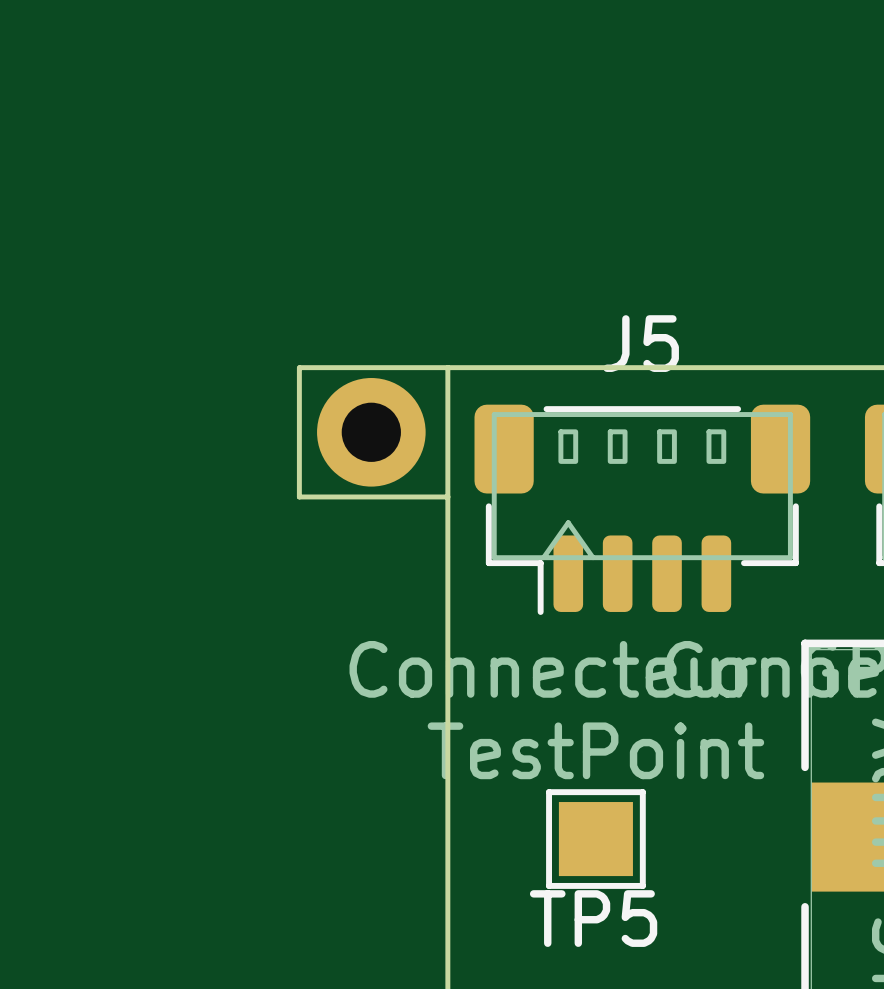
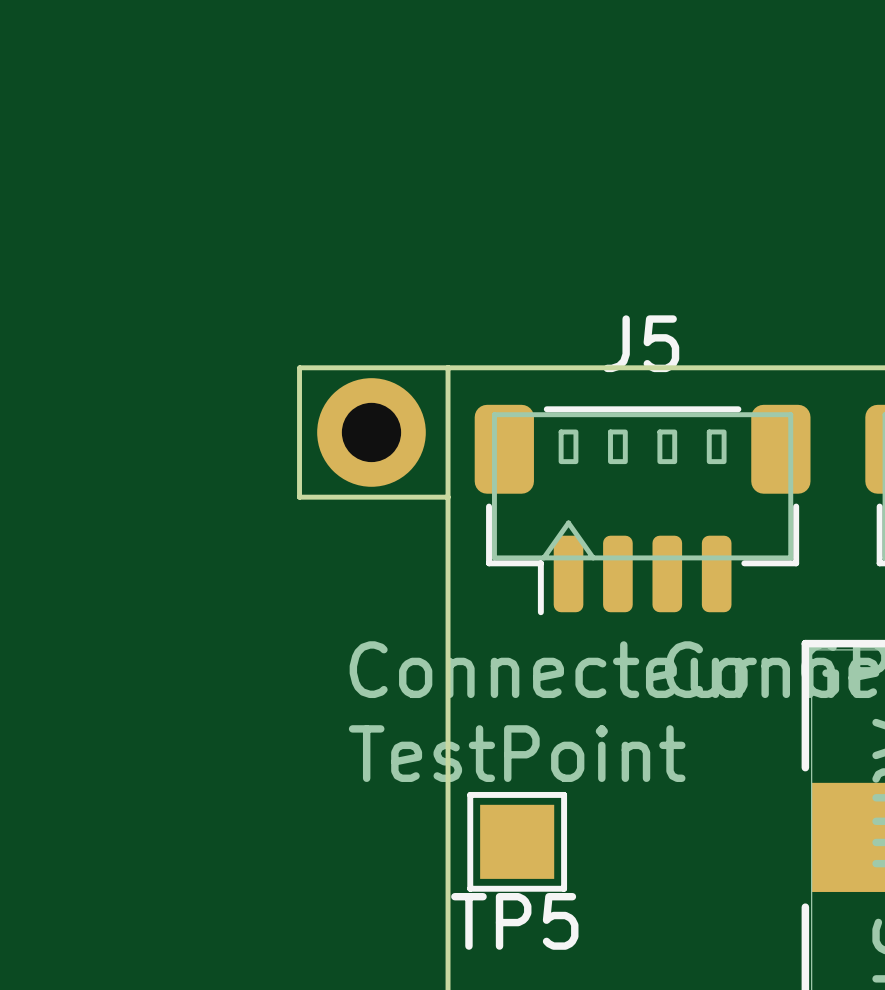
TP5 position: (595, 839) -> (517, 841)

